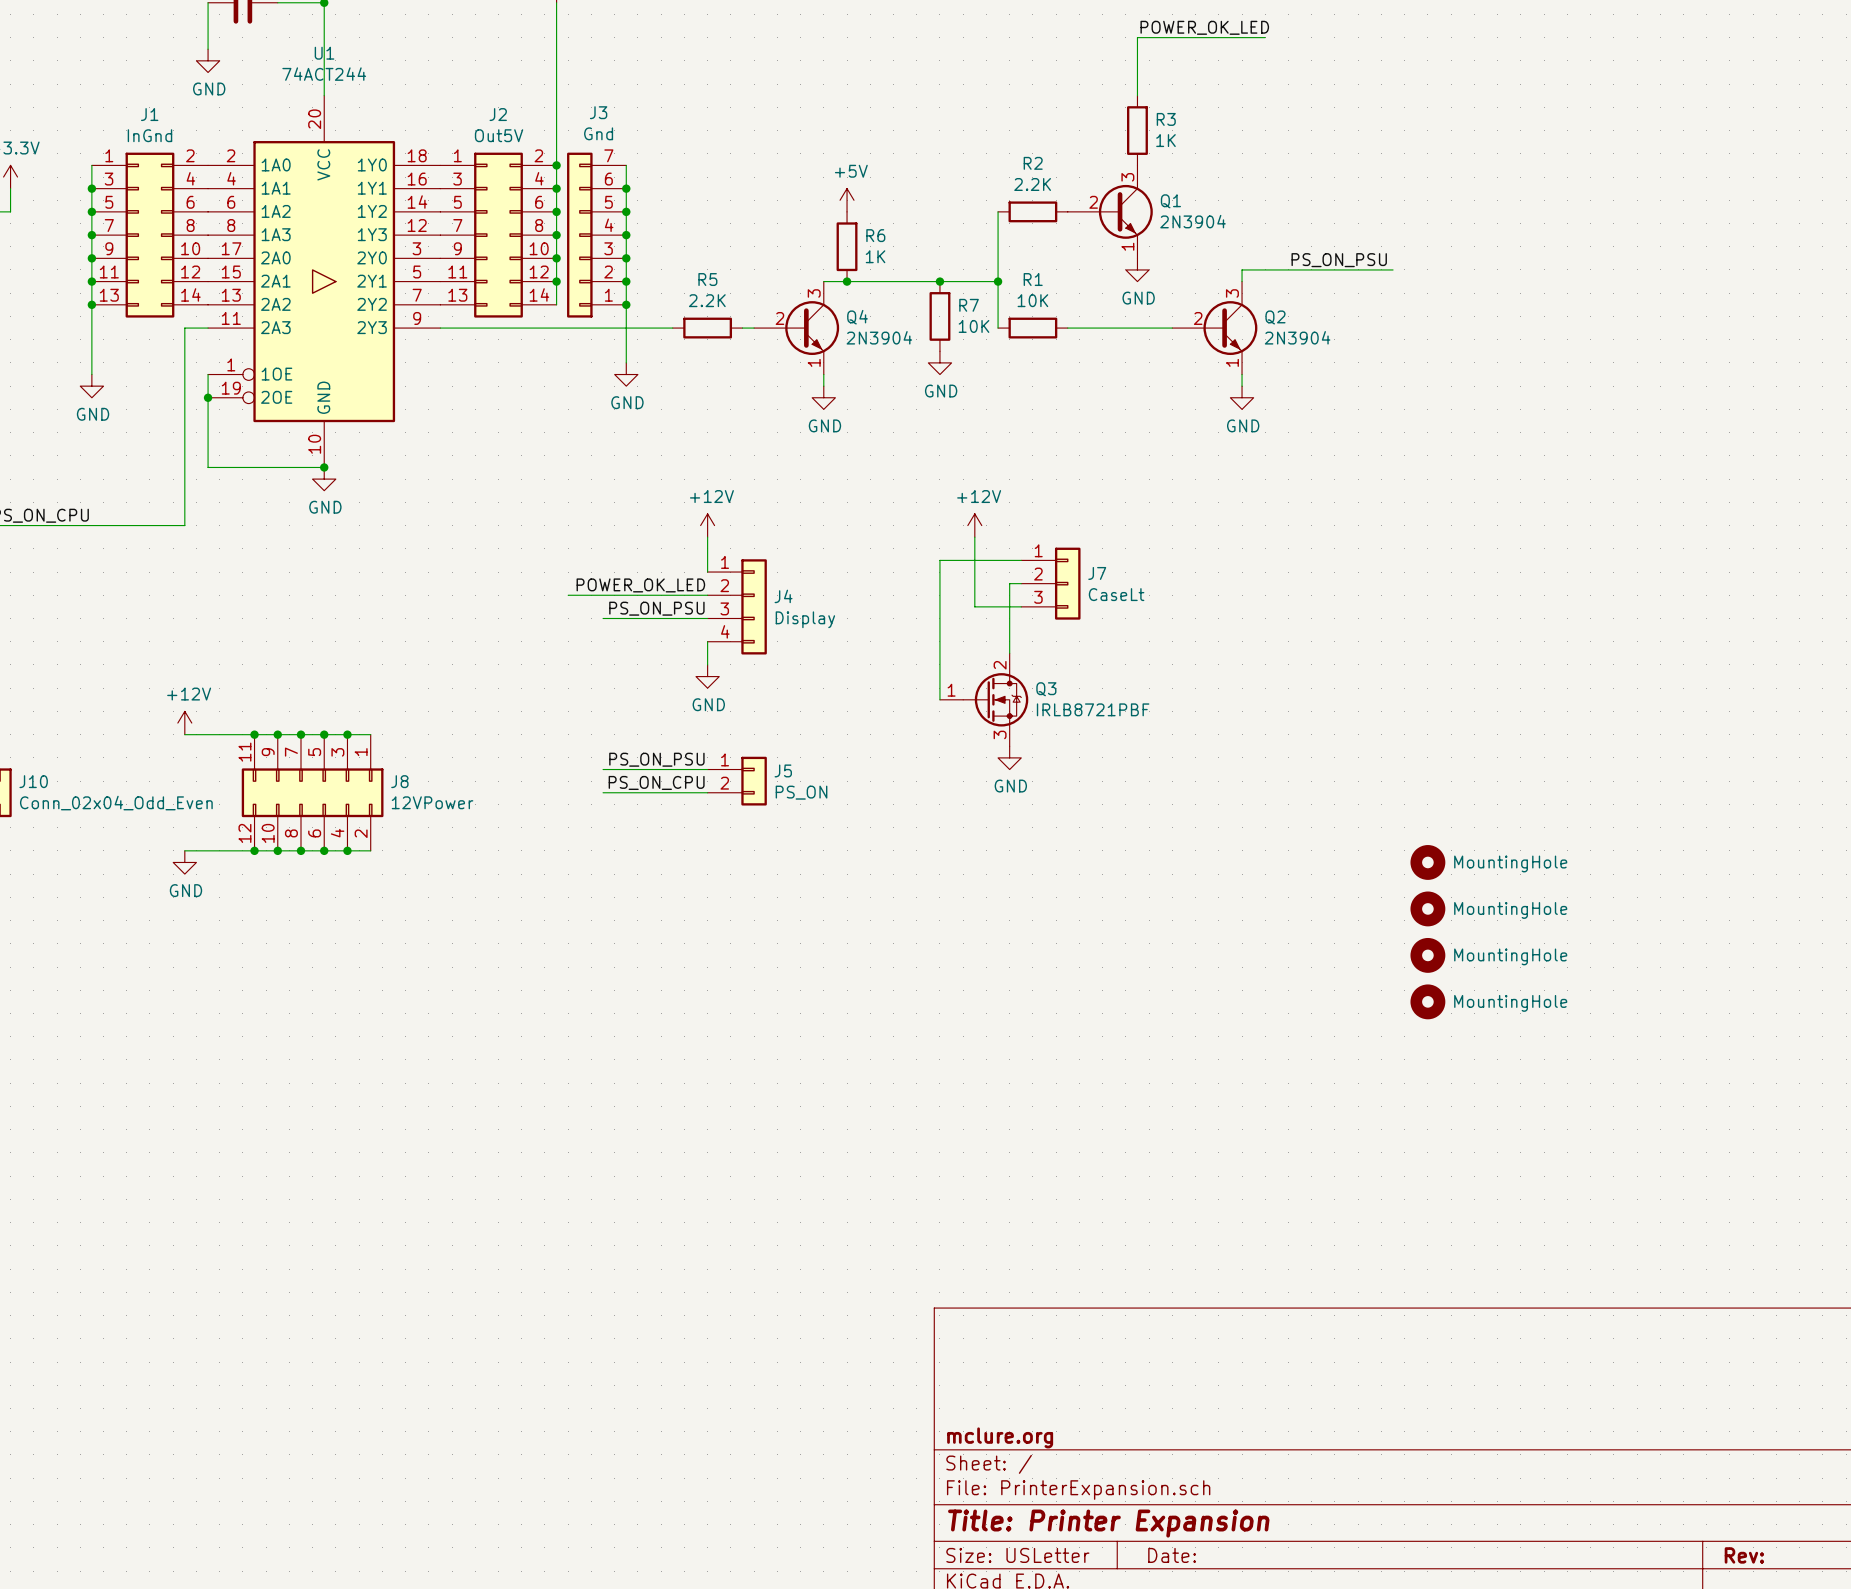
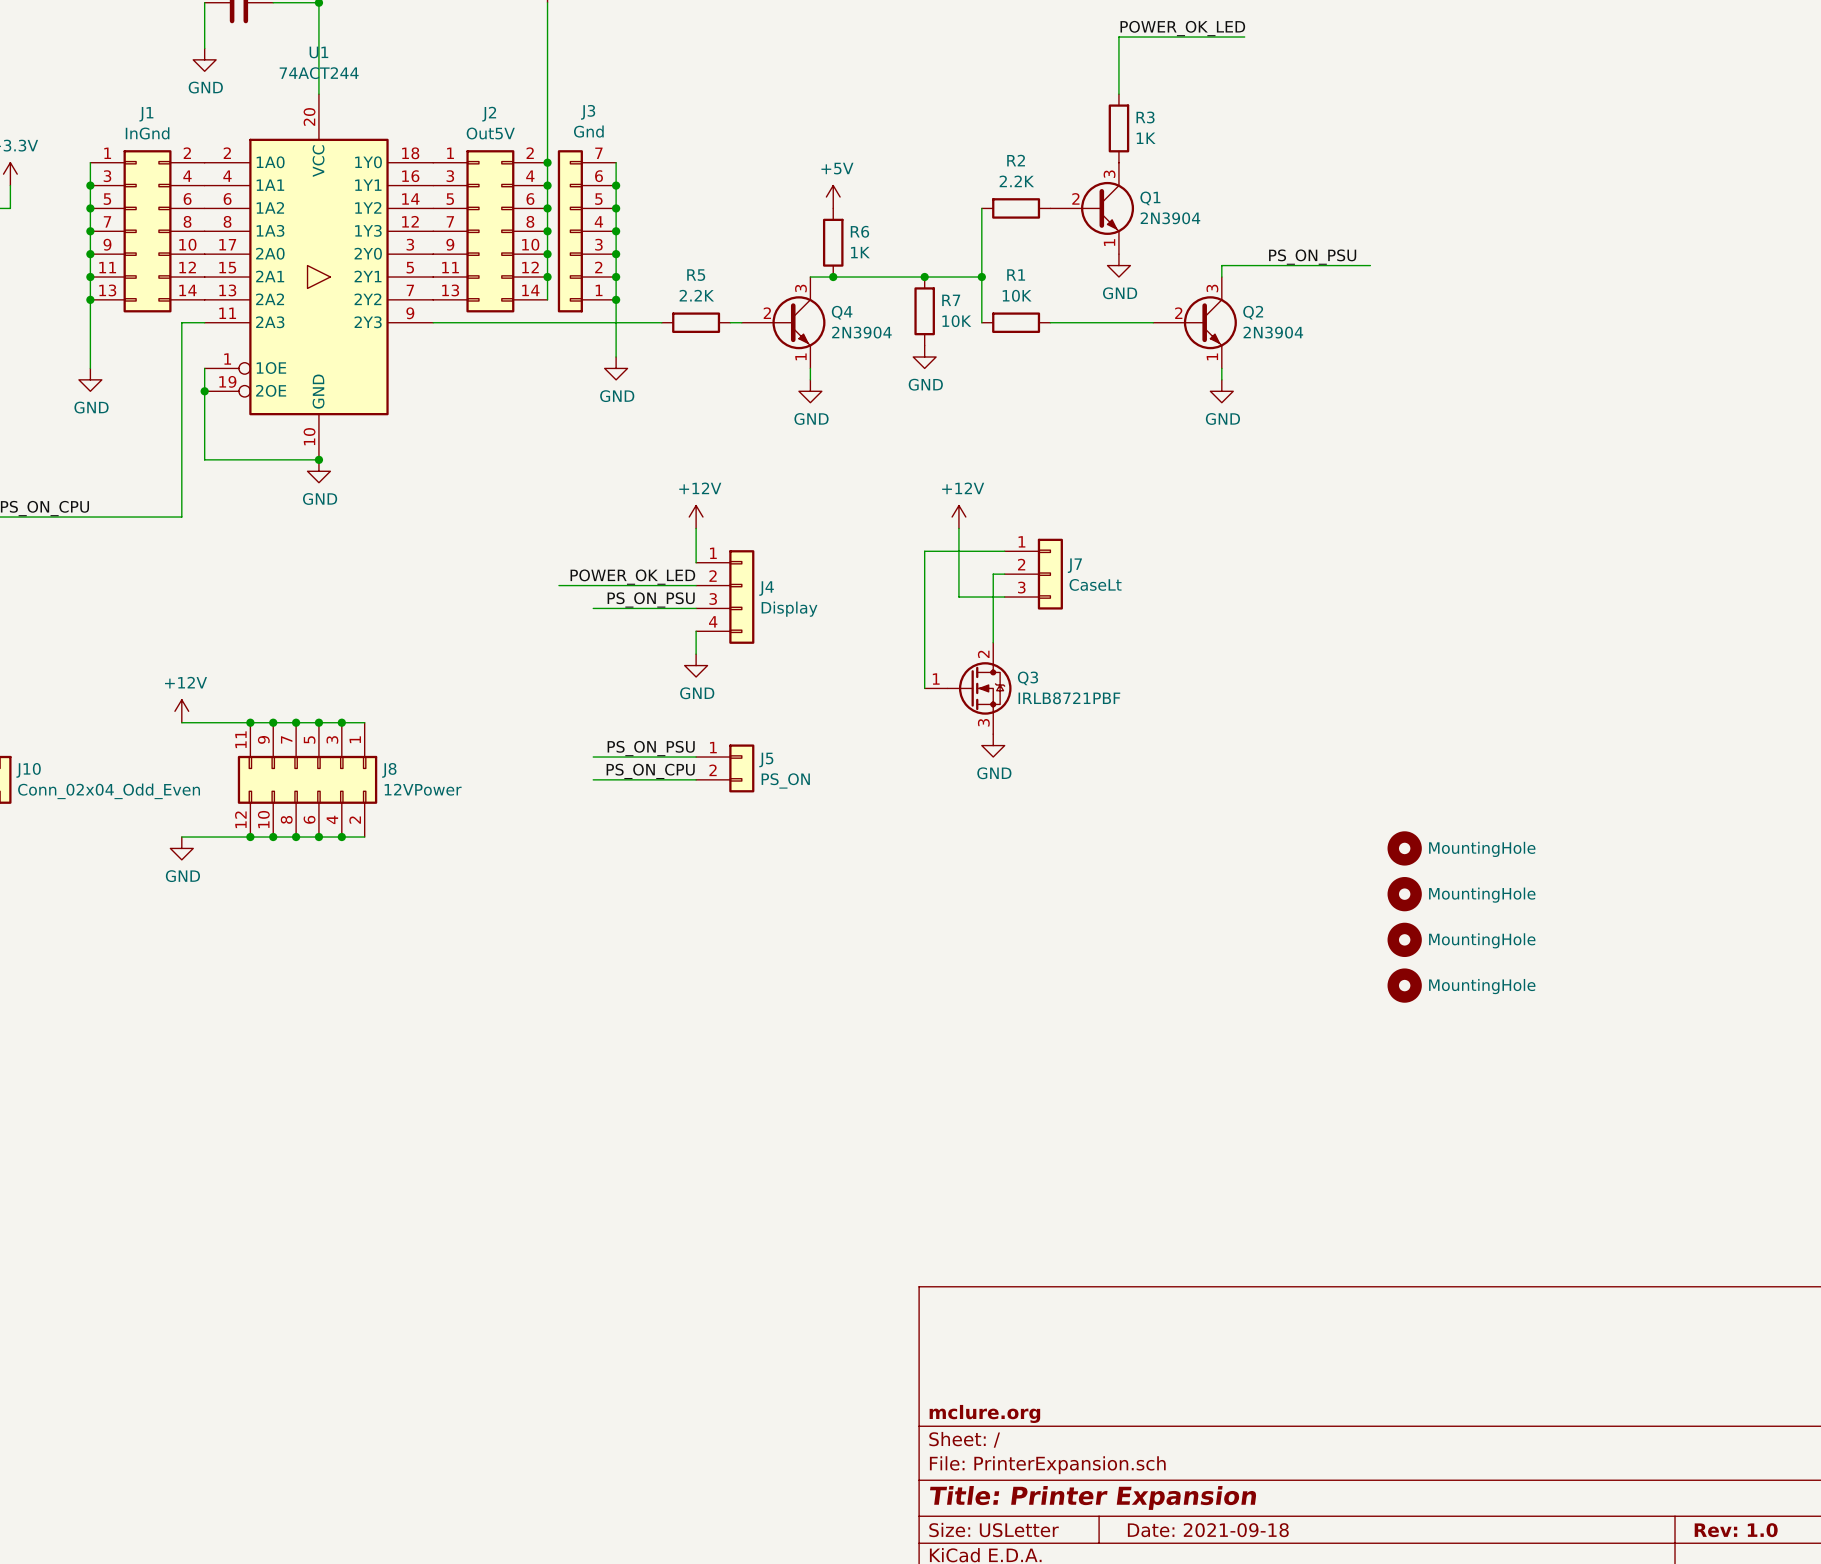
title block: Date: (1172, 1555) -> Date: 2021-09-18 (1208, 1530)
title block: Rev: (1744, 1555) -> Rev: 1.0 (1736, 1530)

